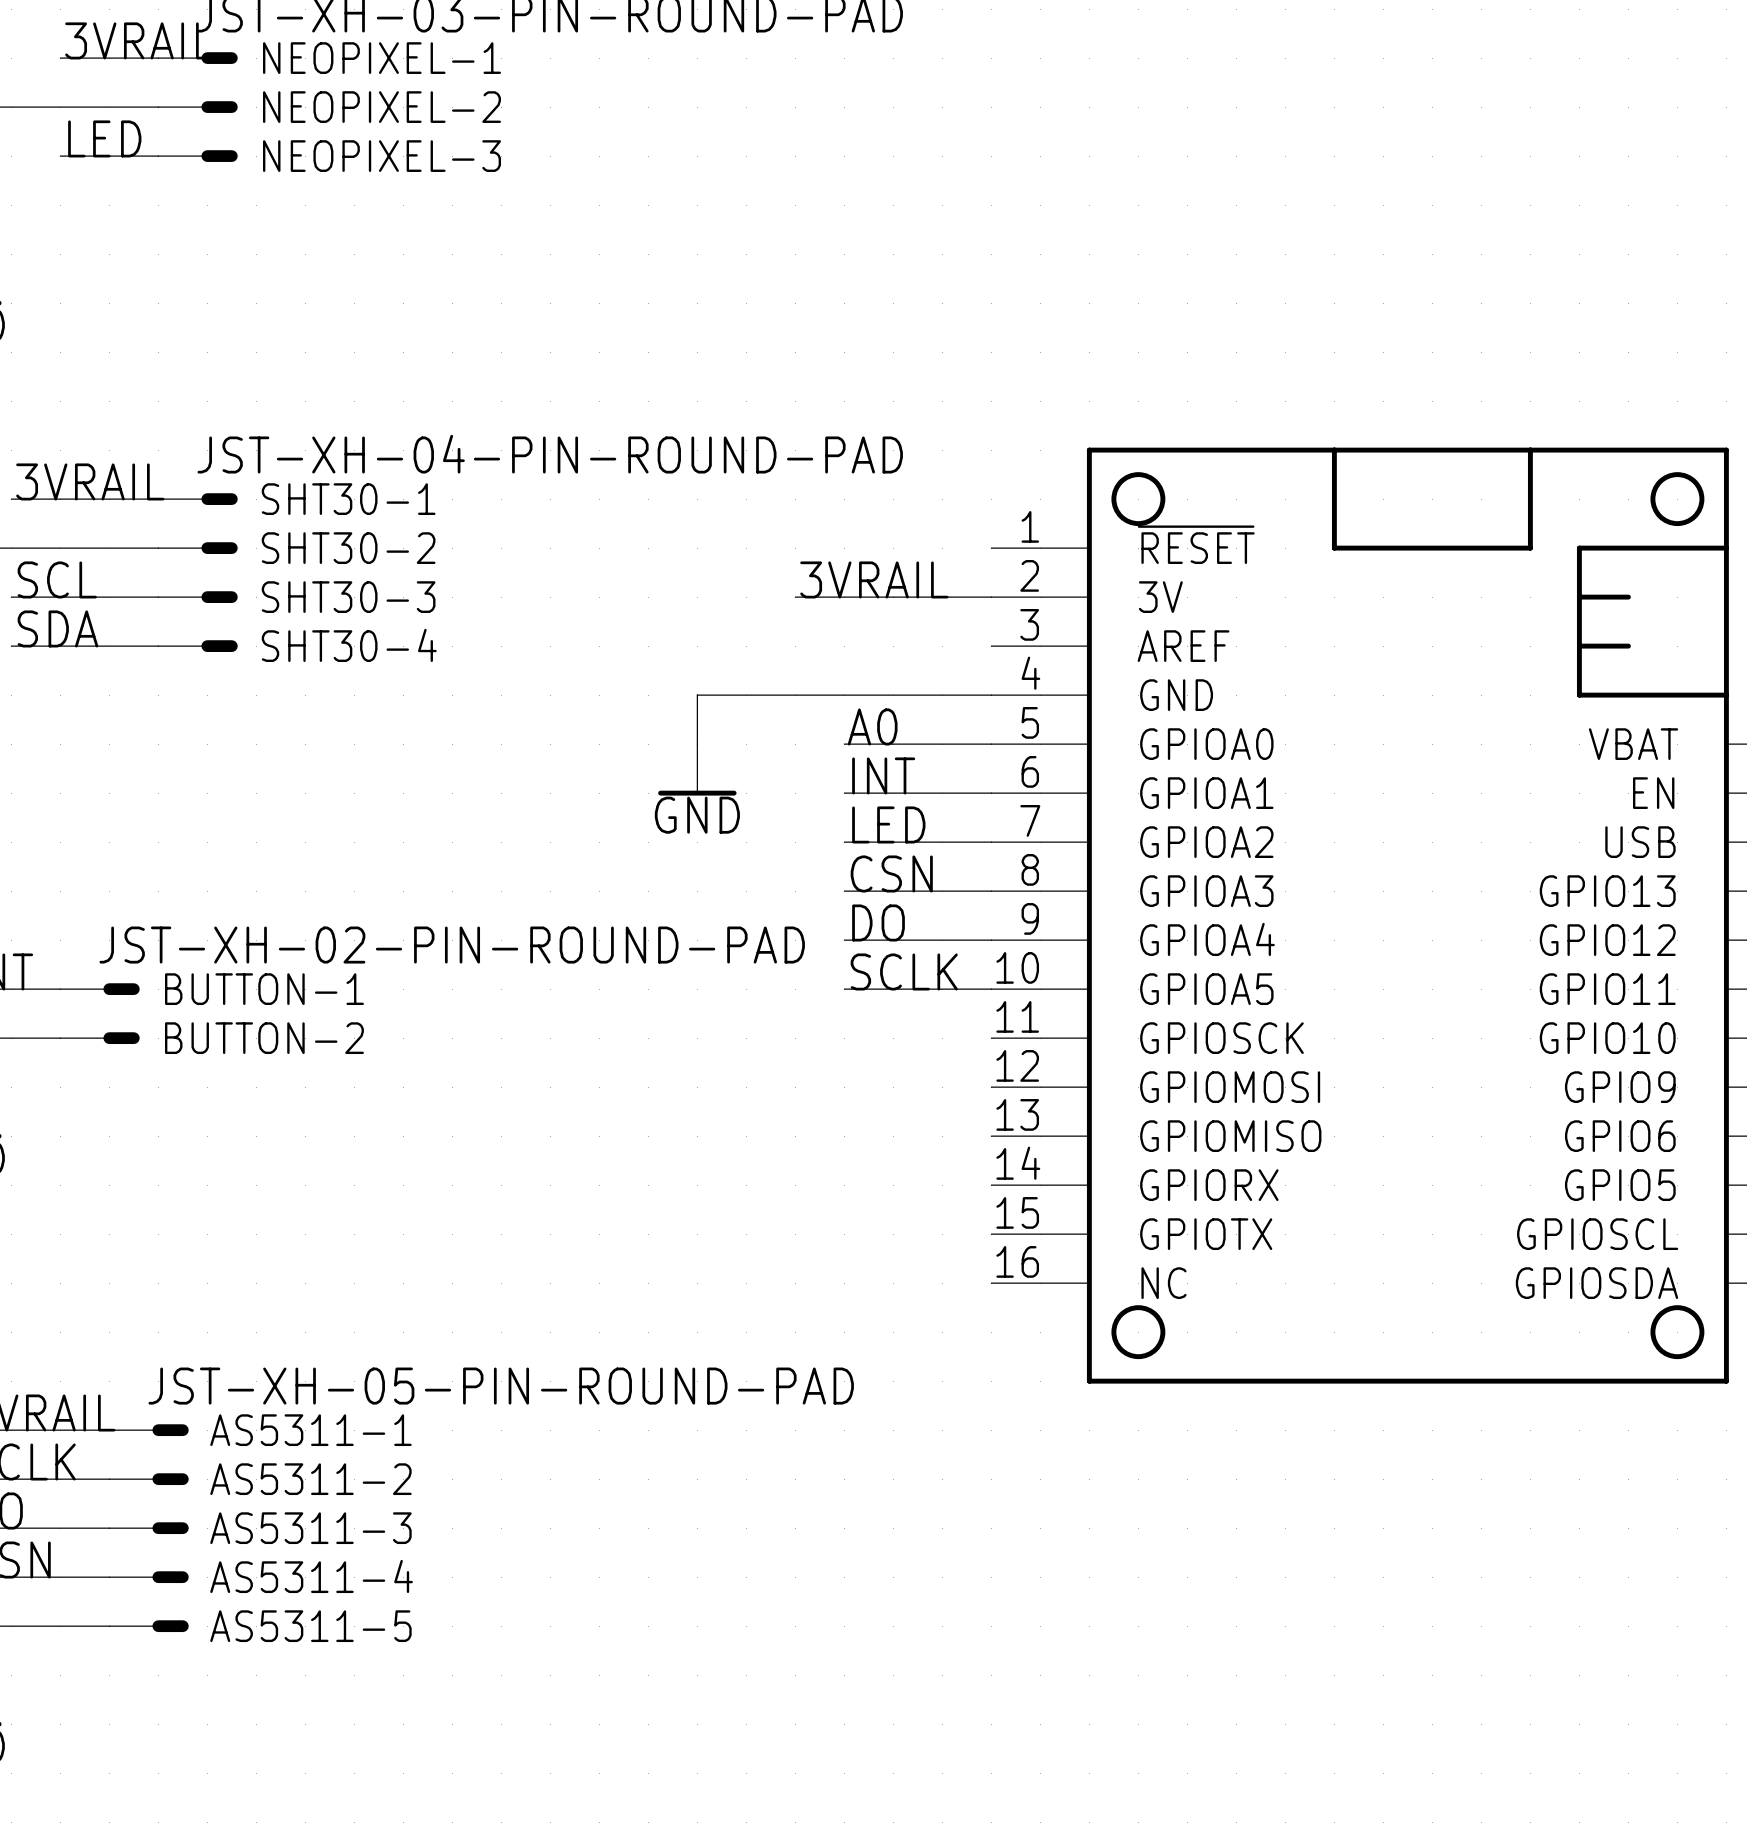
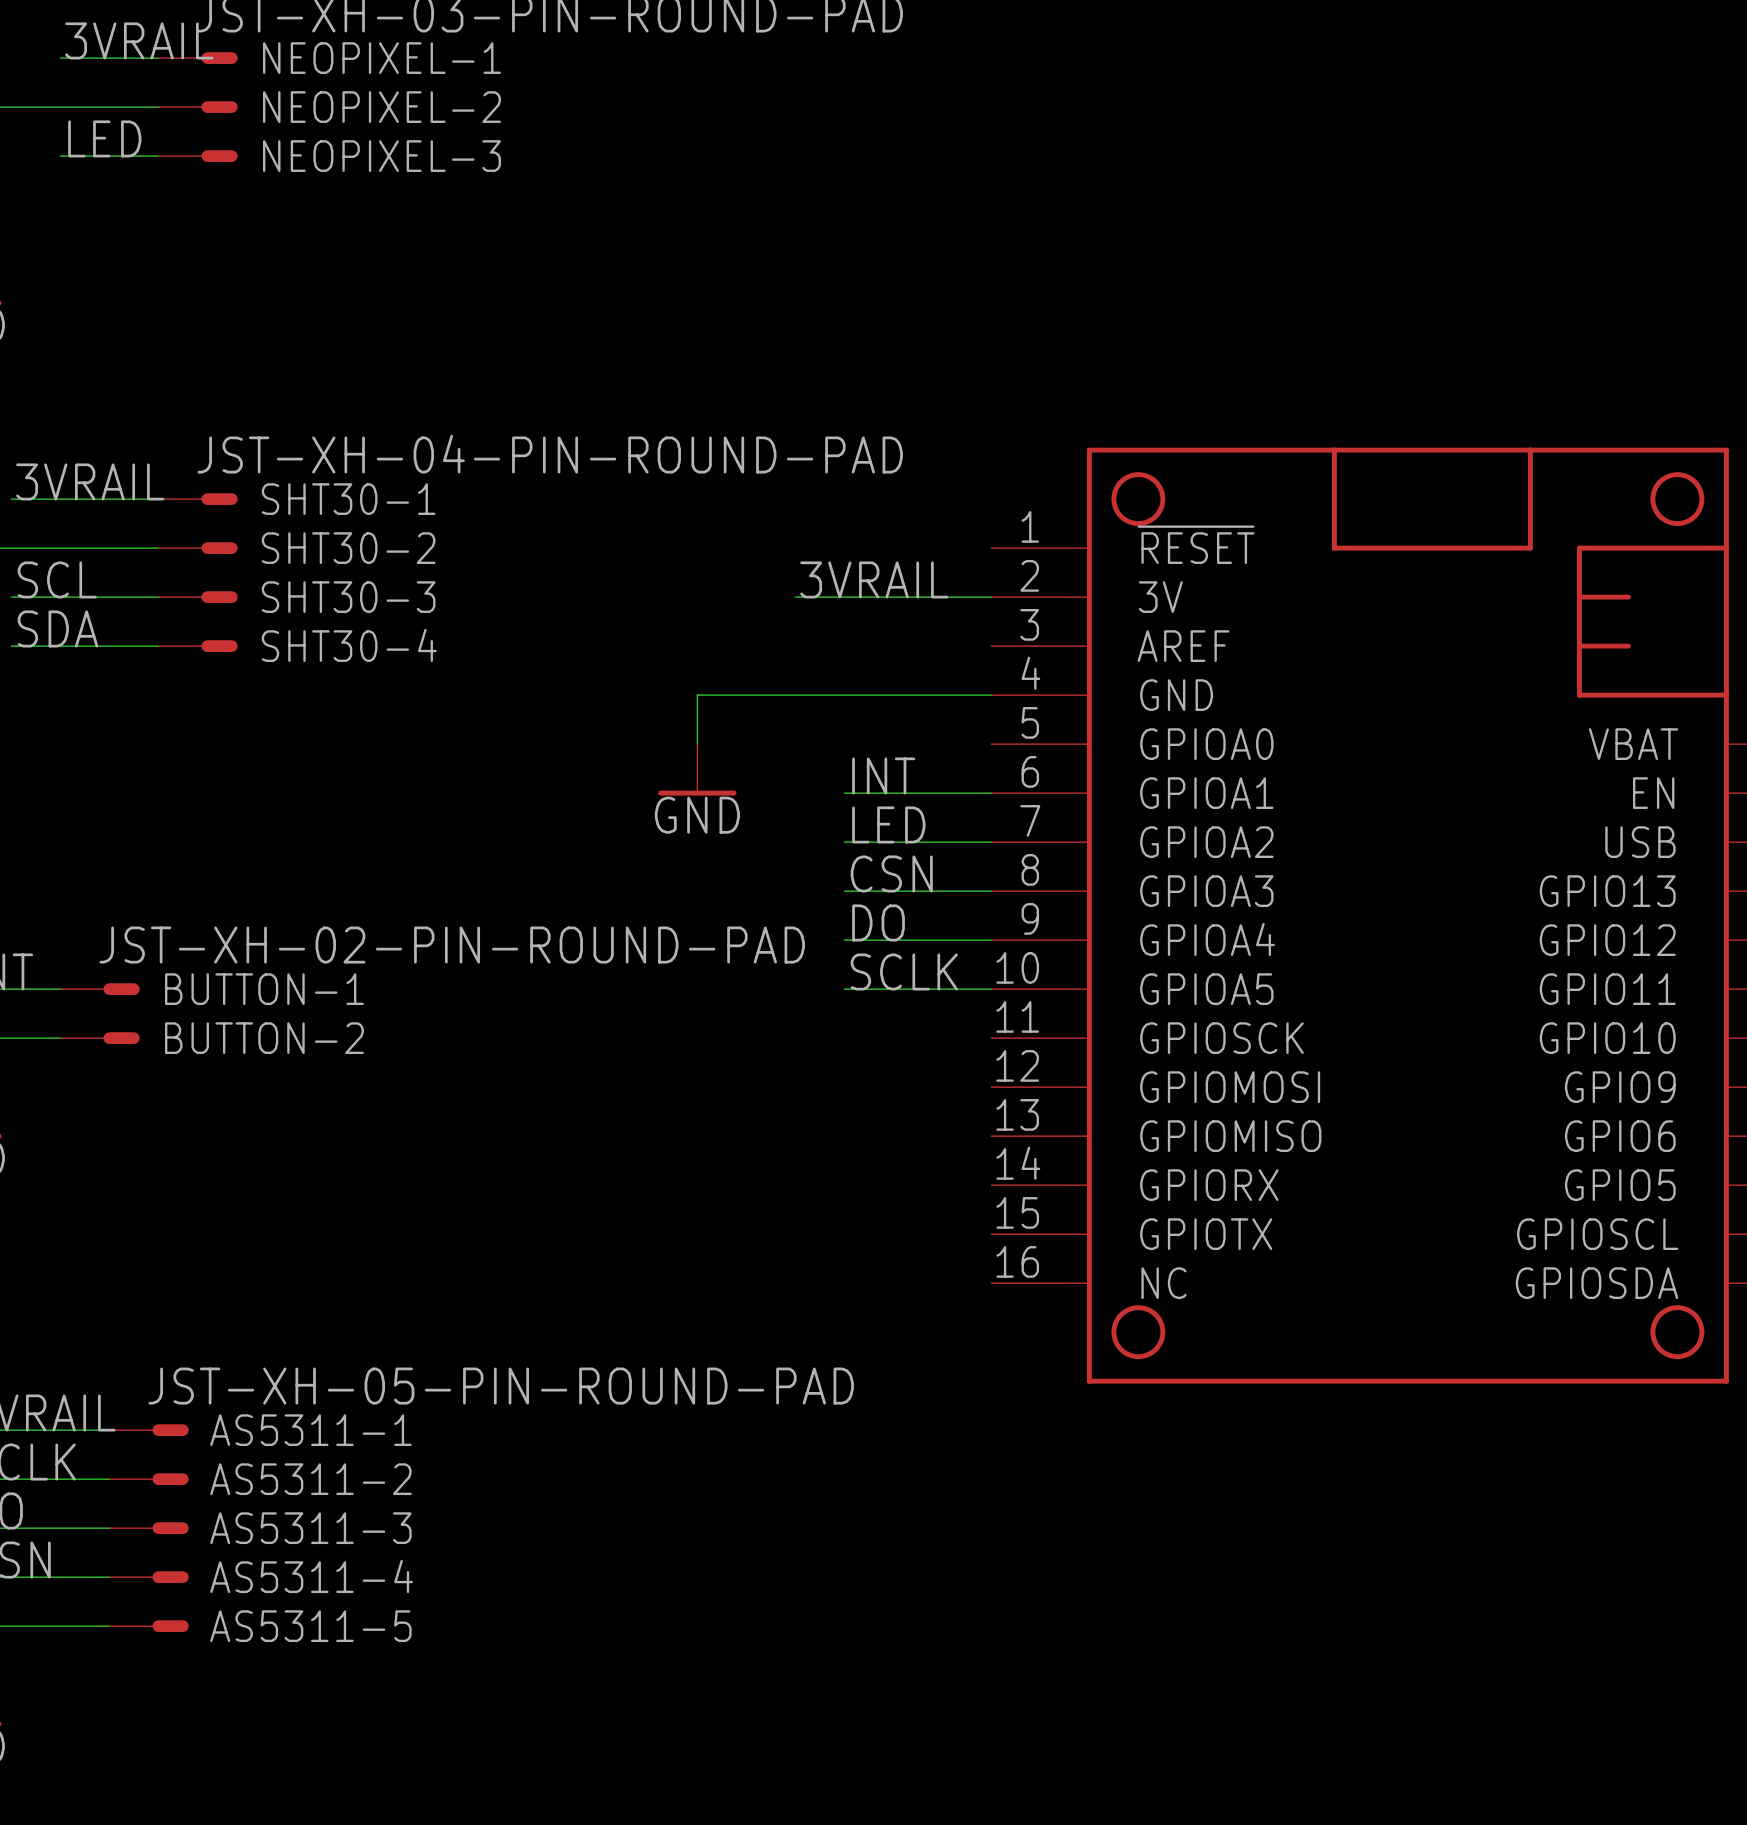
label: A0 (872, 726) -> none
wire: (844, 744) (991, 744) -> none

